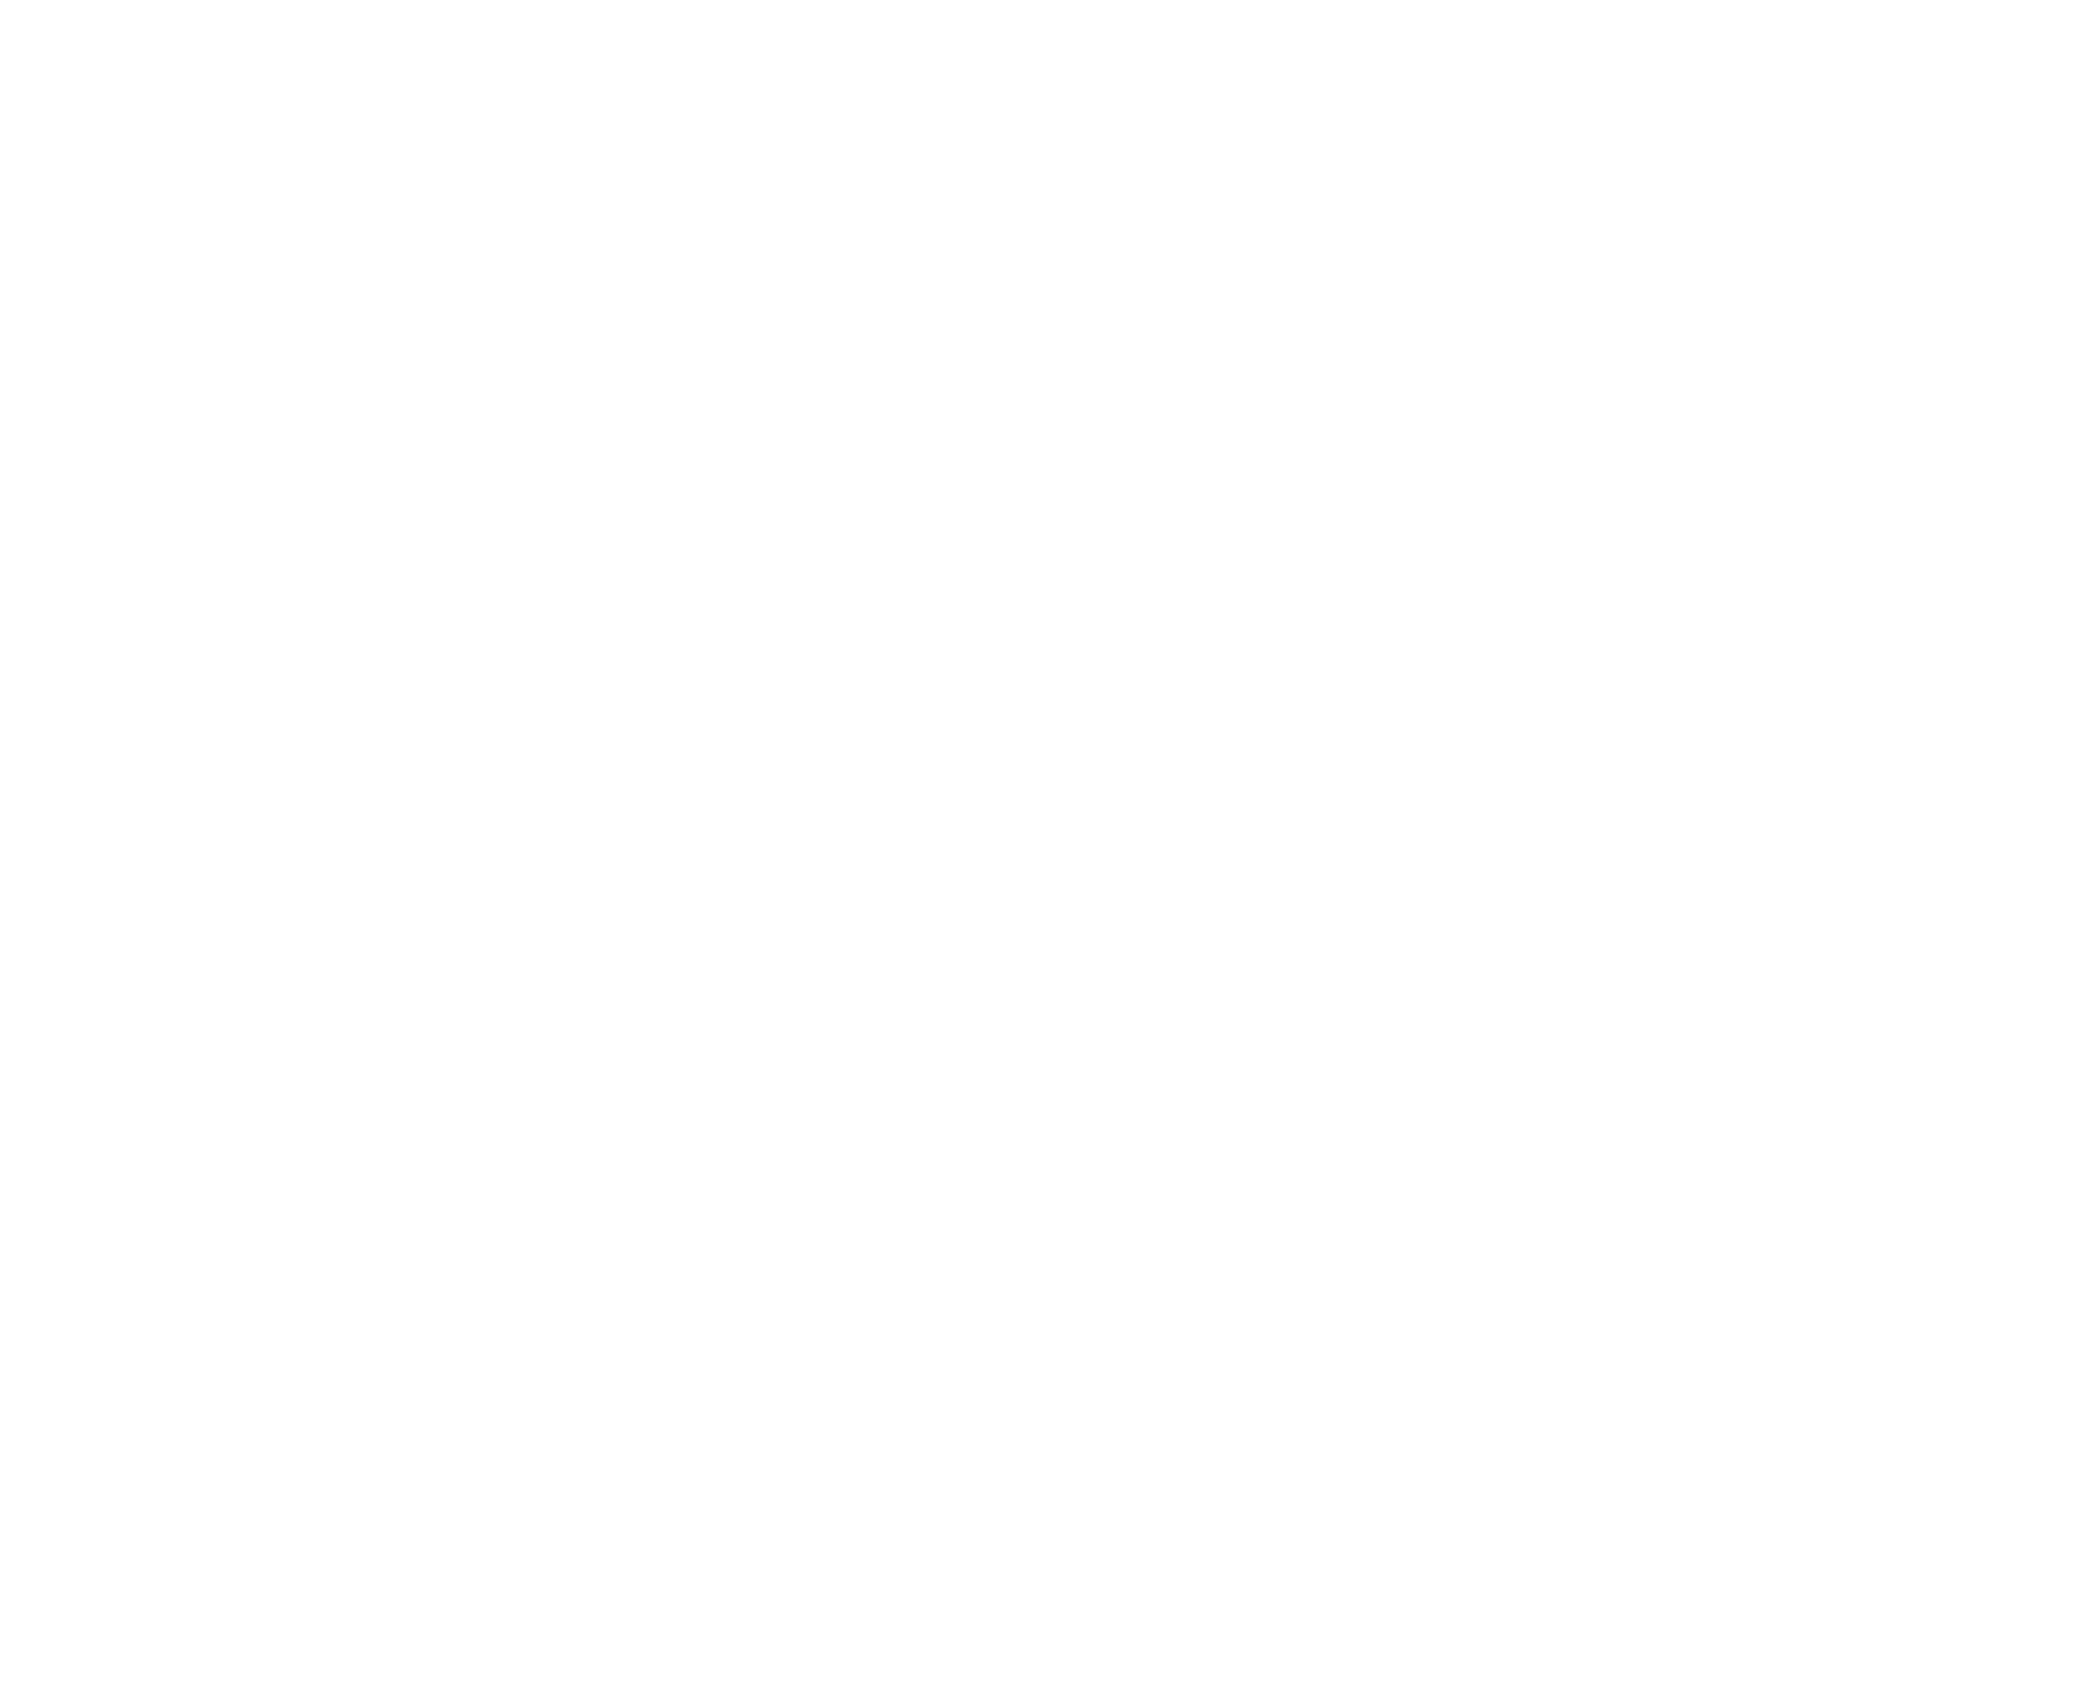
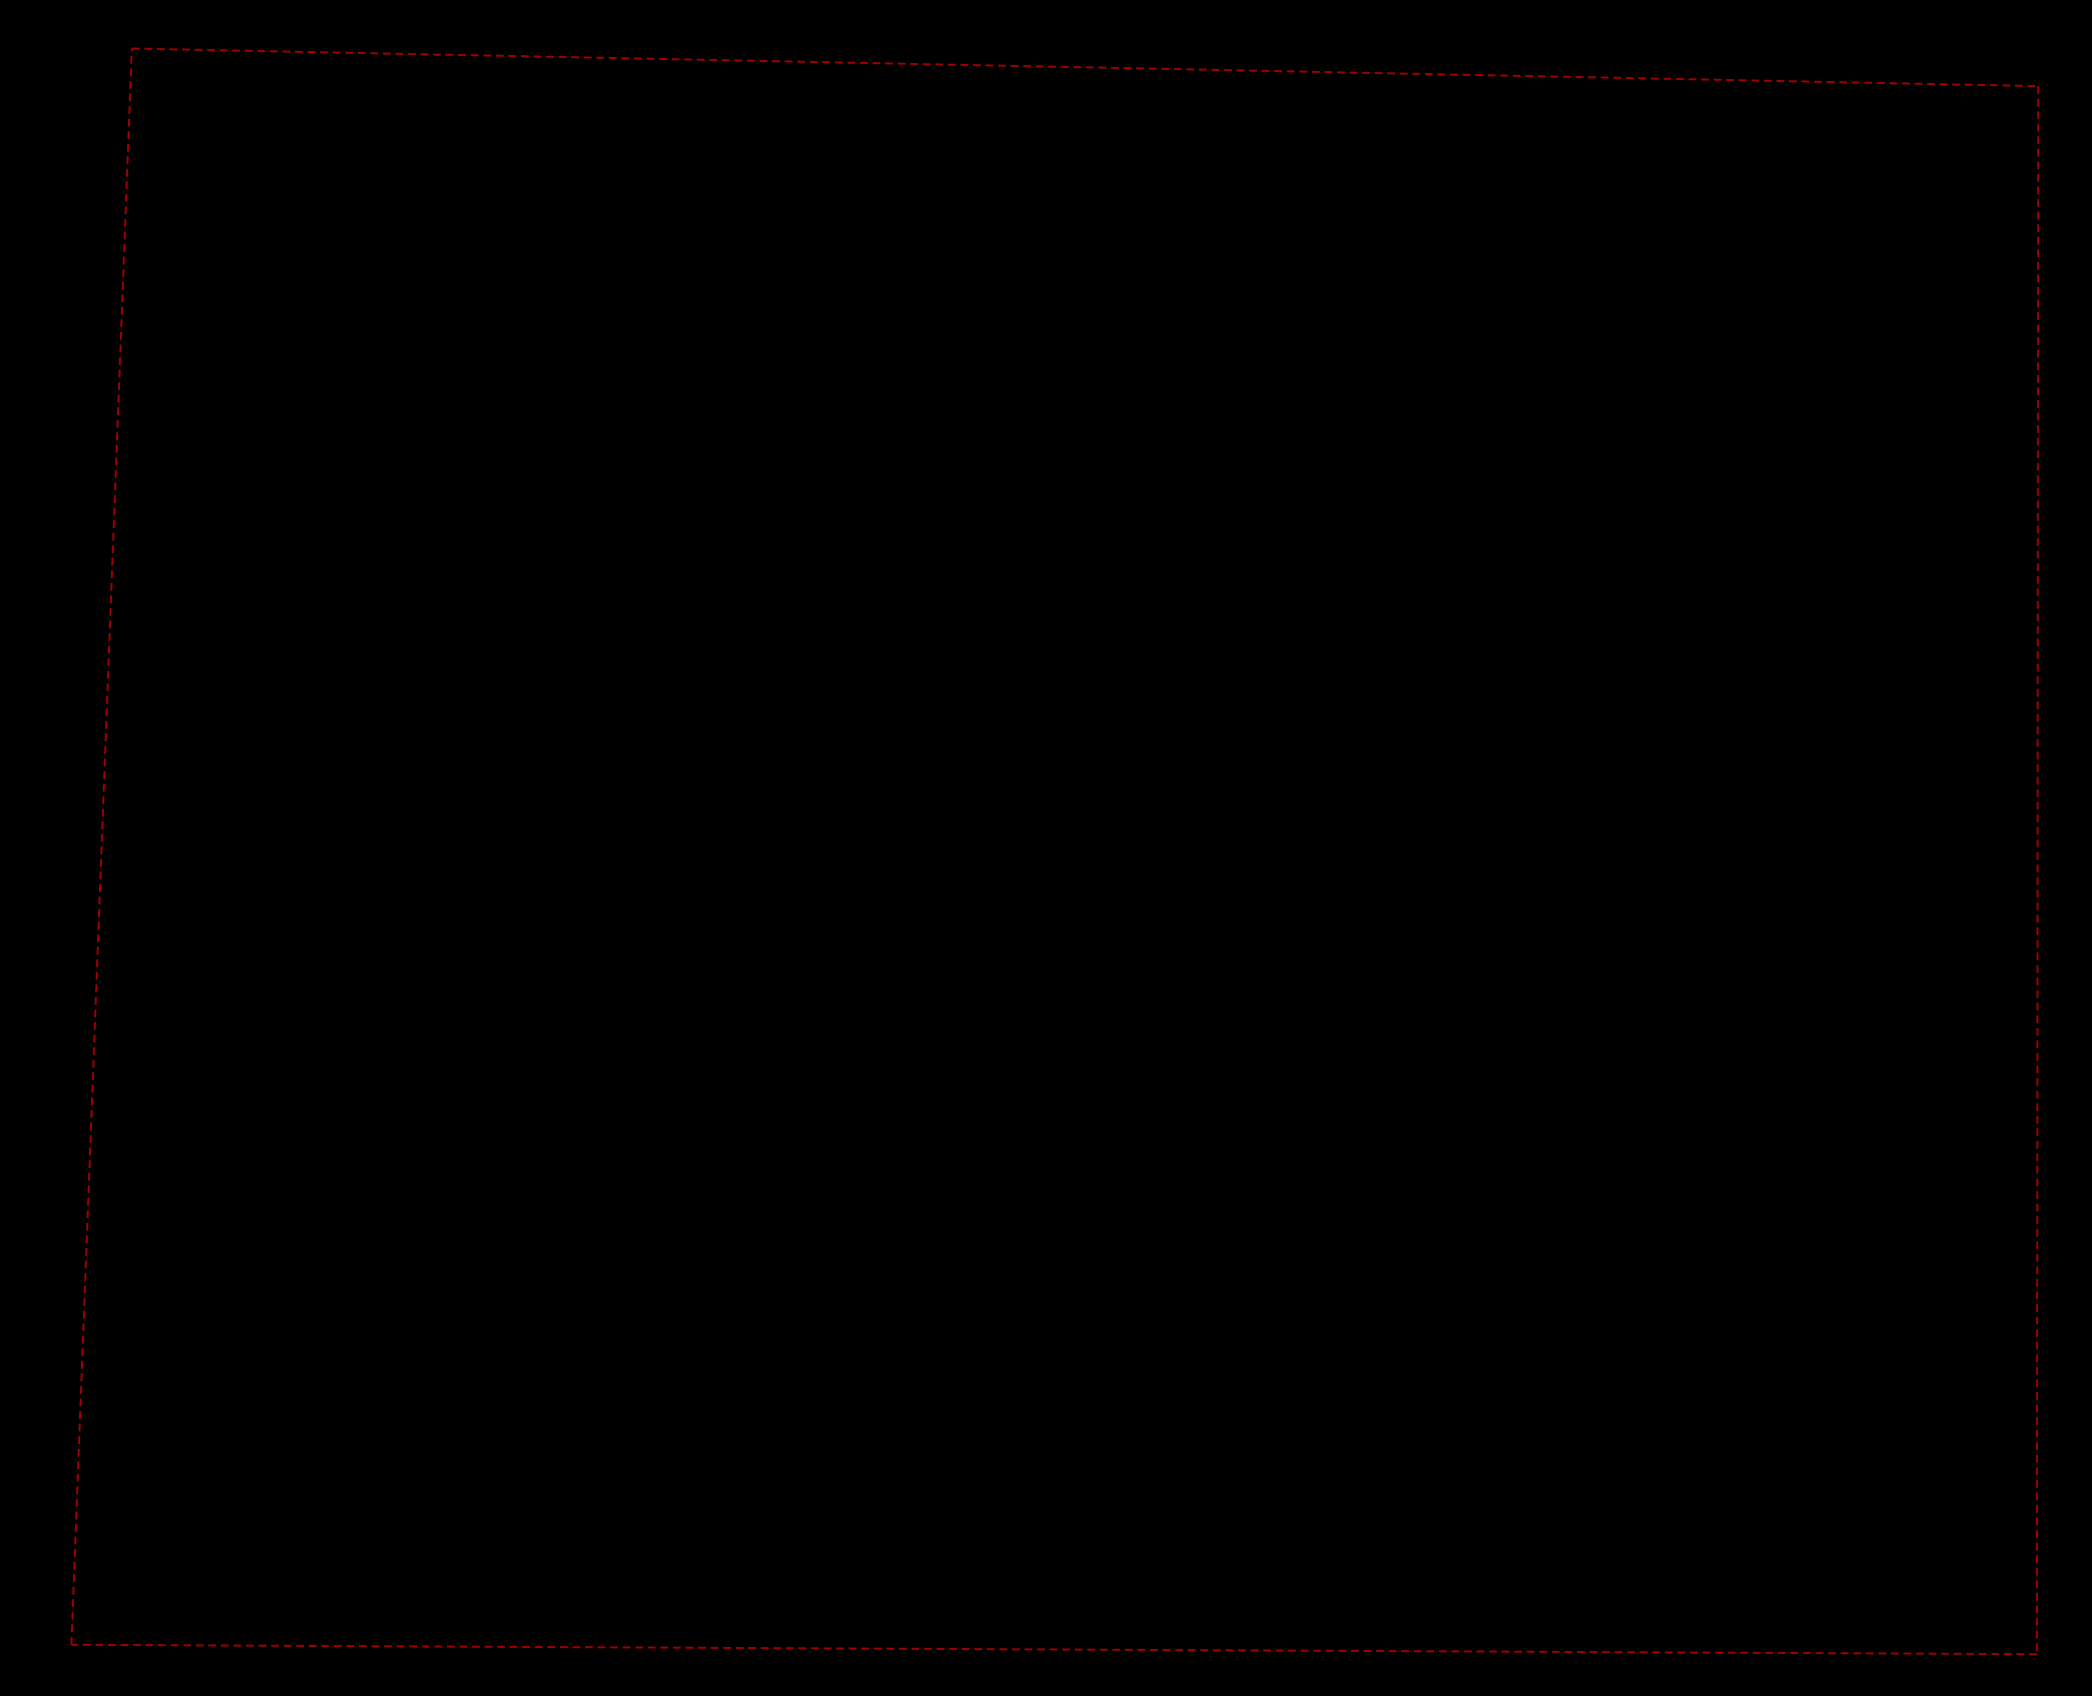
top zone outline: none -> (131, 48) (71, 1644) (2036, 1654) (2038, 86) (131, 48)

